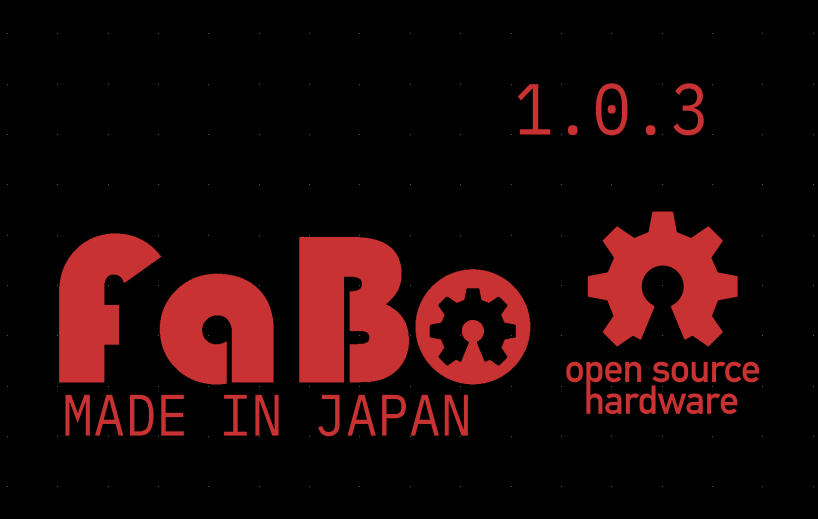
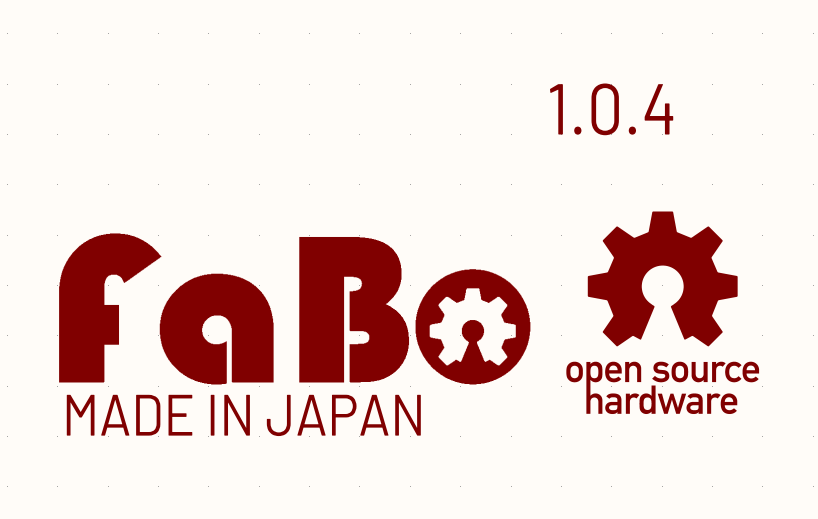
text: 1.0.3 (610, 109) -> 1.0.4 (611, 109)

